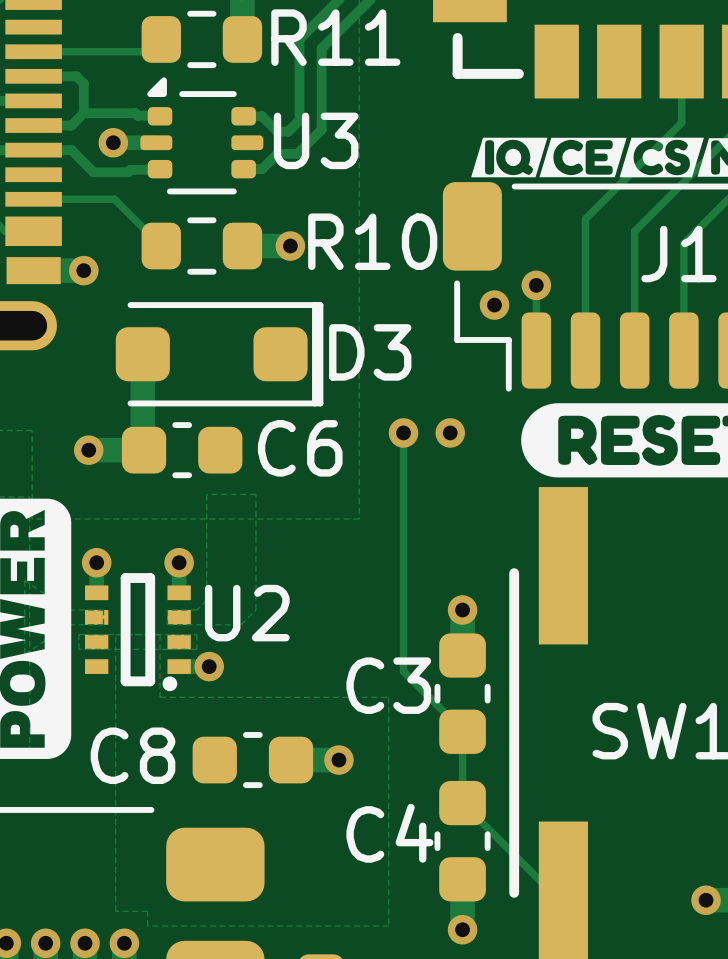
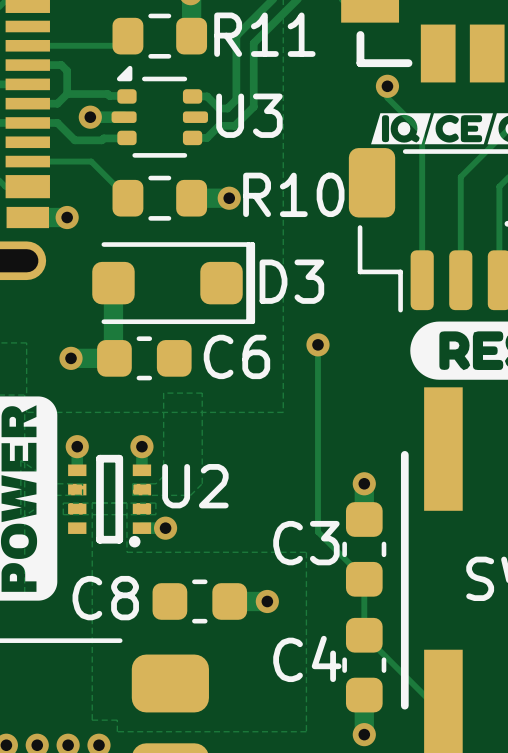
track: none -> (387, 86) (387, 97) (422, 132) (422, 229)
via: none -> (387, 86)
via: (536, 285) -> none
via: (494, 305) -> none
via: (450, 432) -> none

